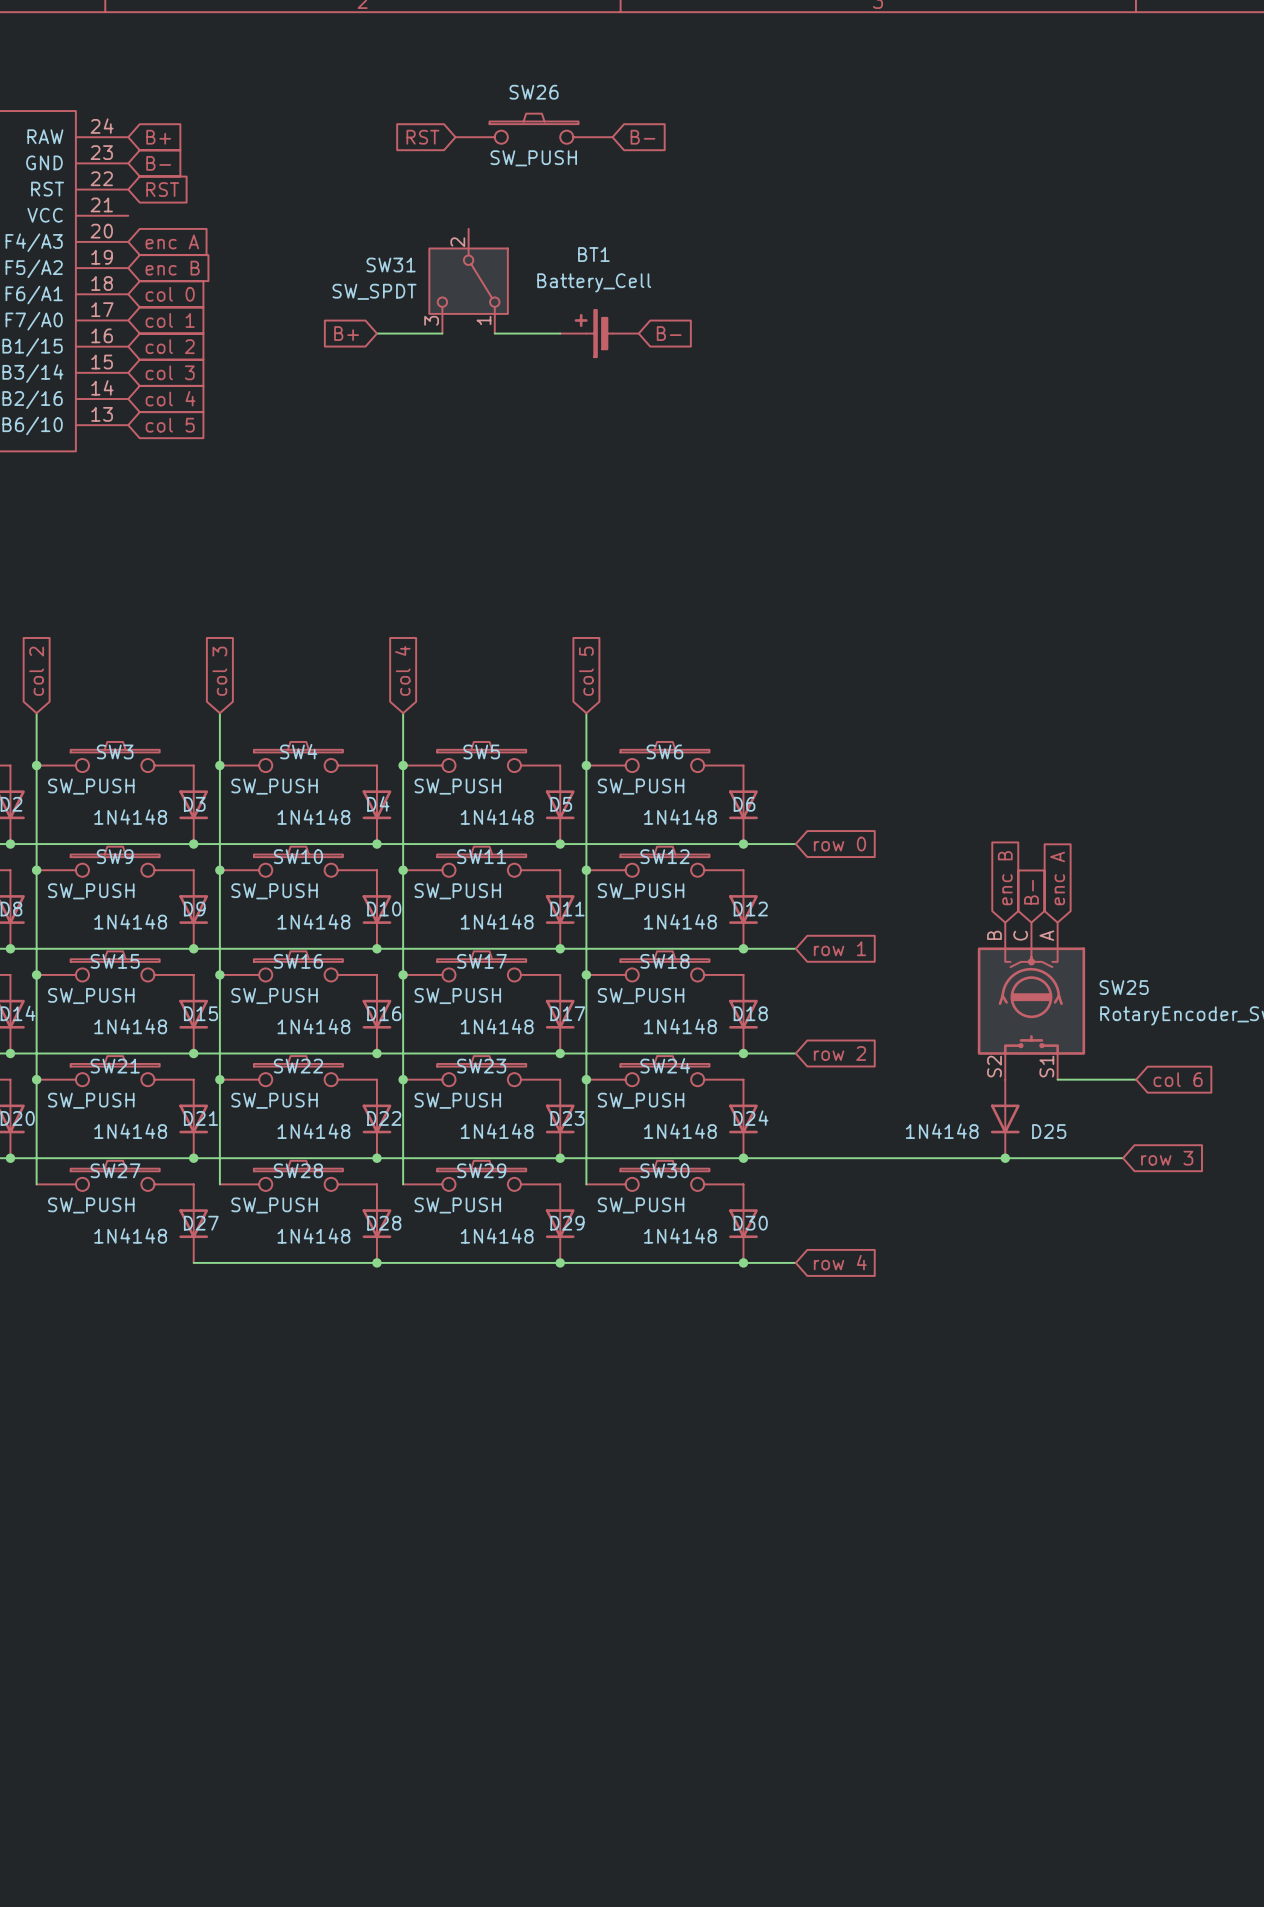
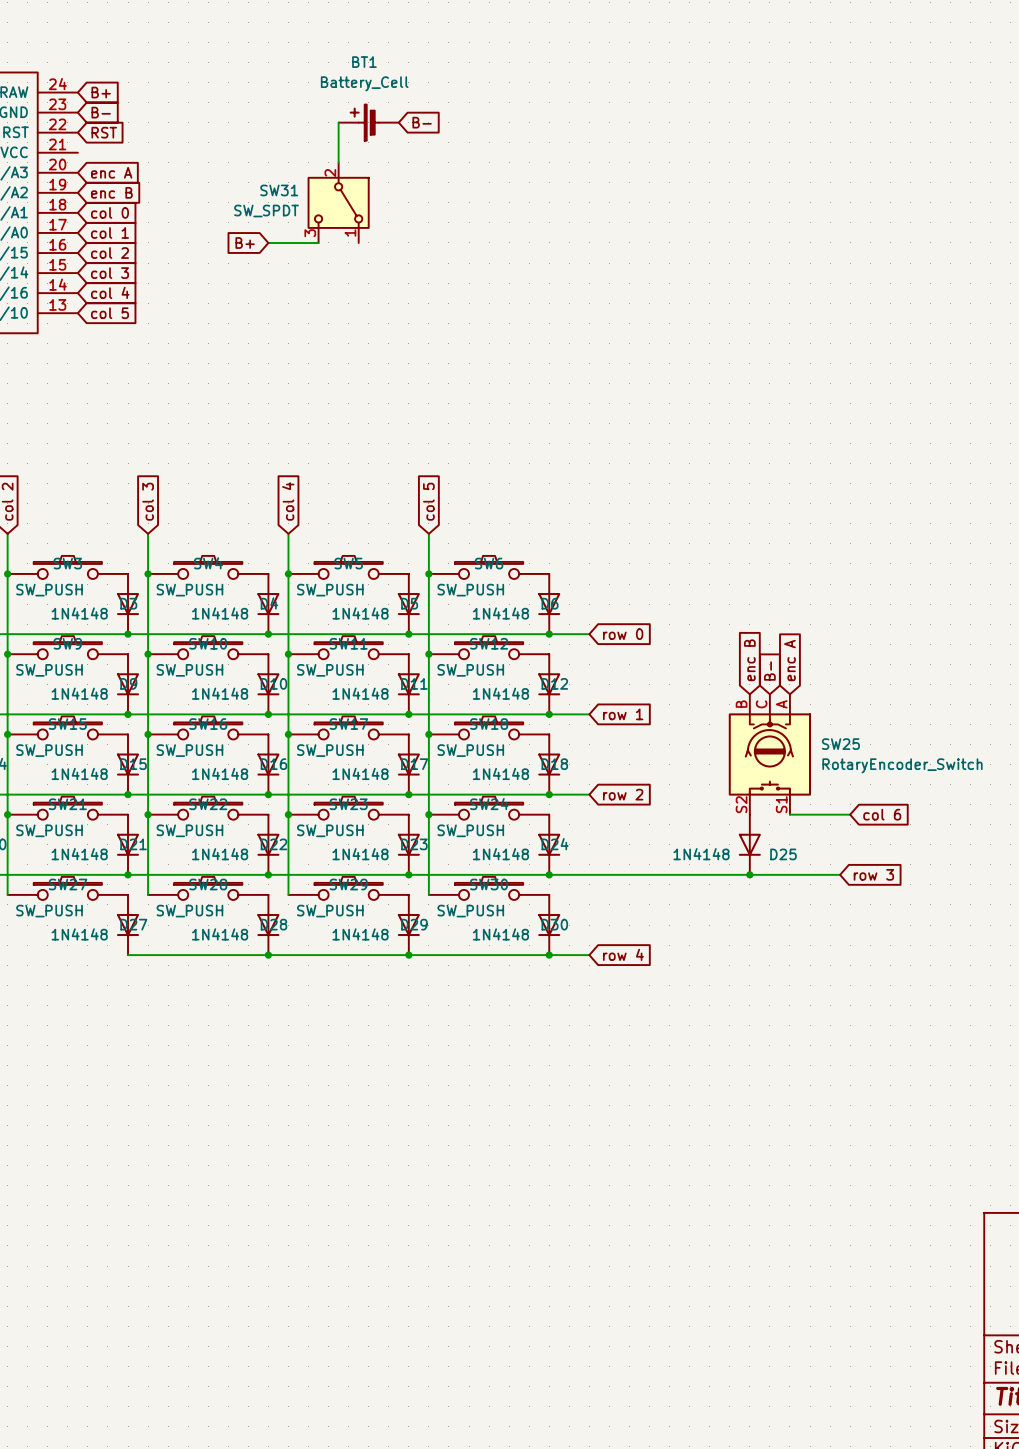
SW26: SW_PUSH (534, 128) -> none
global label: RST (422, 137) -> none
global label position: B- (642, 137) -> B- (422, 122)
wire: none -> (338, 122) (338, 162)
wire: (494, 333) (560, 333) -> none
BT1 position: (599, 333) -> (368, 122)
global label: B- (669, 333) -> none

